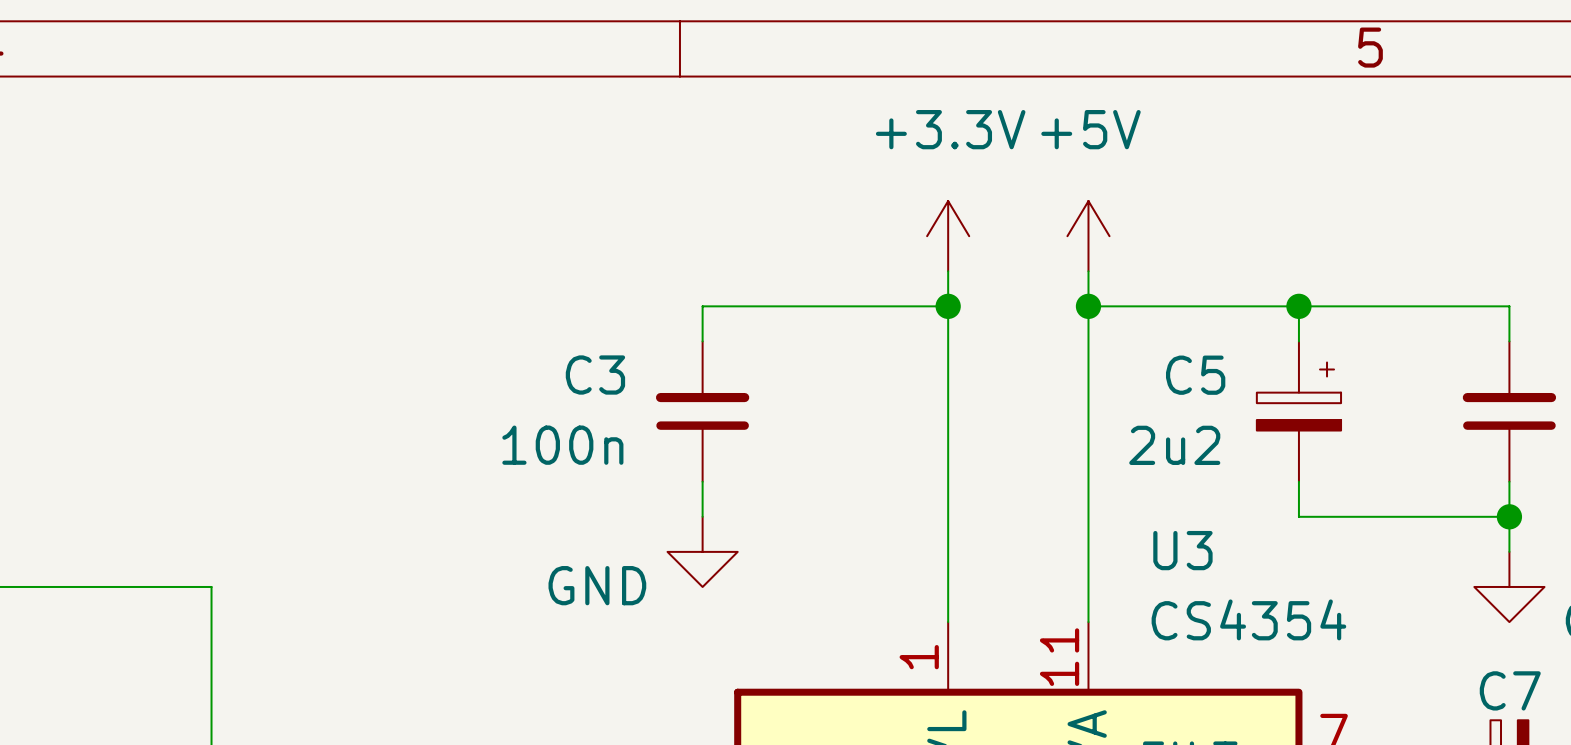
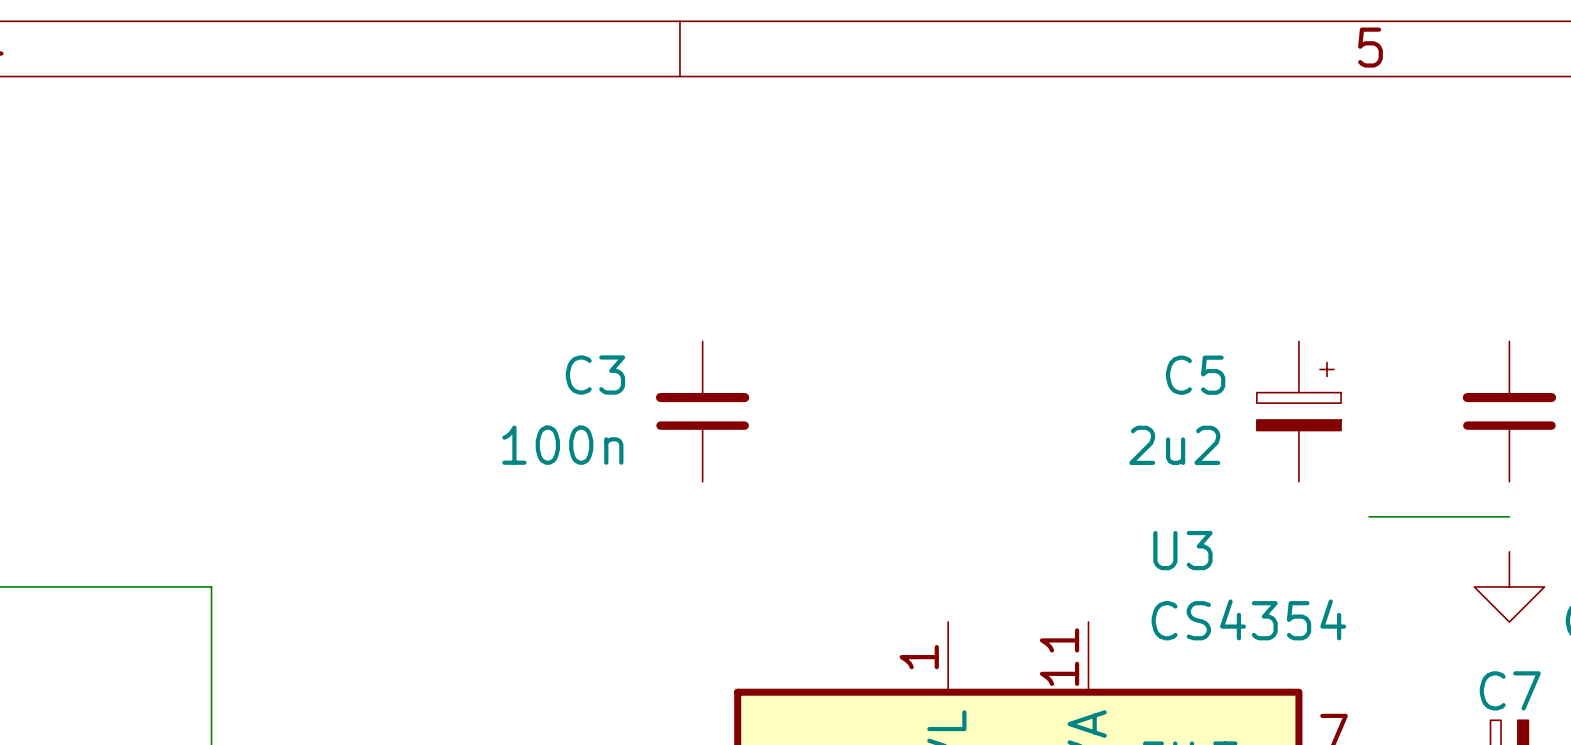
power symbol: +3.3V (948, 236) -> none
power symbol: +5V (1088, 236) -> none
wire: (948, 271) (948, 622) -> none
wire: (1088, 271) (1088, 622) -> none
wire: (948, 306) (702, 306) (702, 341) -> none
junction: (948, 306) -> none
wire: (1088, 306) (1509, 306) (1509, 341) -> none
junction: (1088, 306) -> none
wire: (1298, 306) (1298, 341) -> none
junction: (1298, 306) -> none
wire: (702, 481) (702, 516) -> none
wire: (1298, 481) (1298, 516) (1369, 516) -> none
wire: (1509, 481) (1509, 551) -> none
junction: (1509, 516) -> none
power symbol: GND (702, 551) -> none

